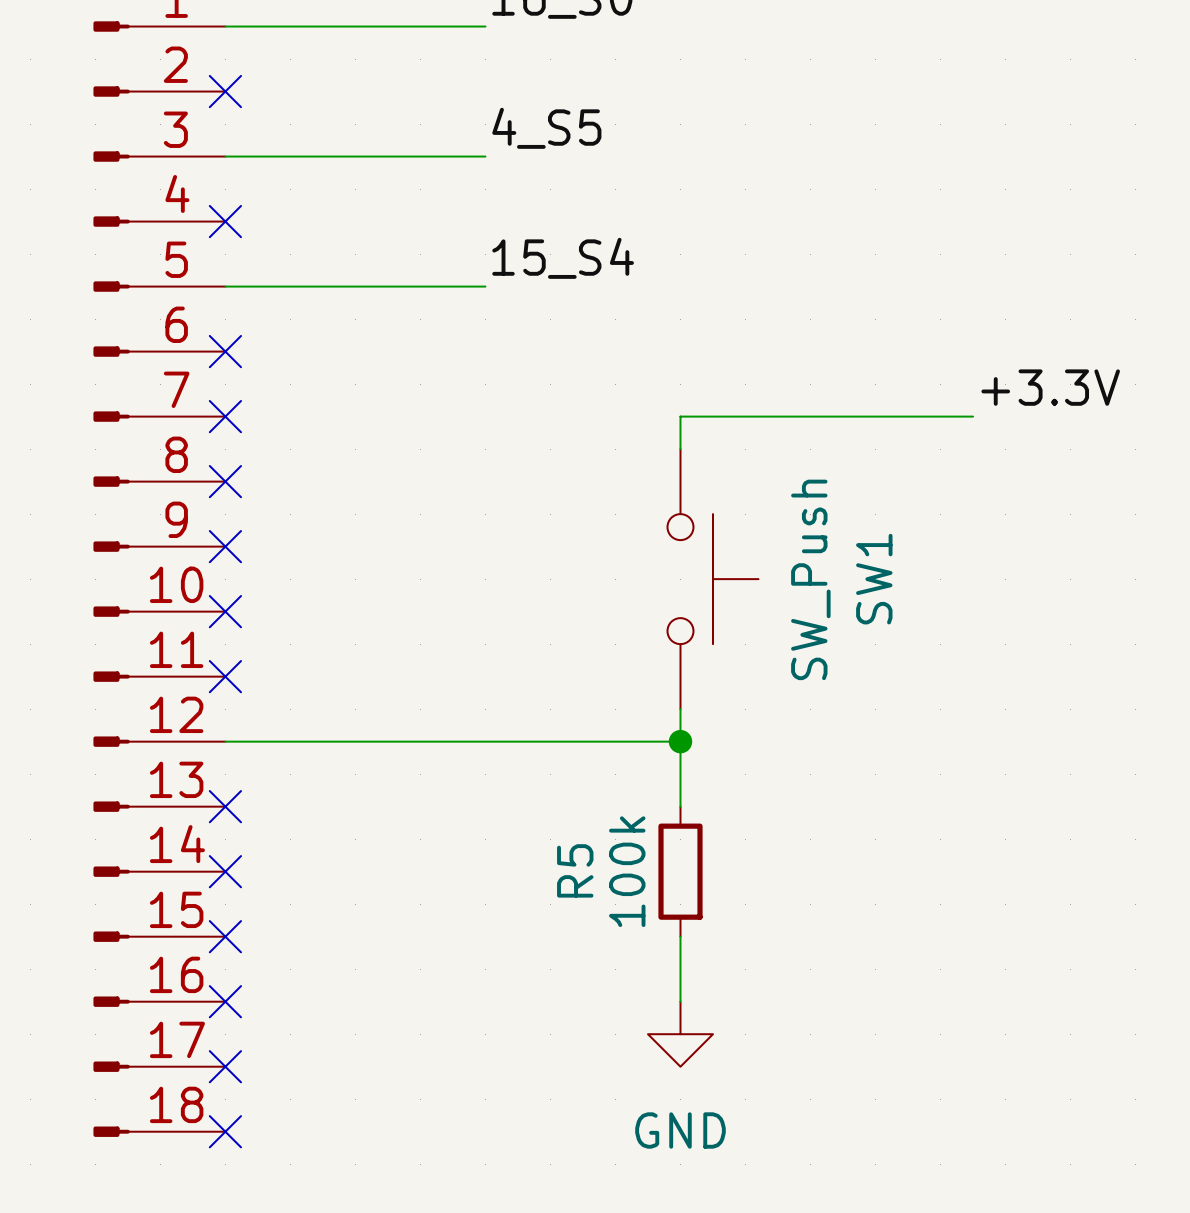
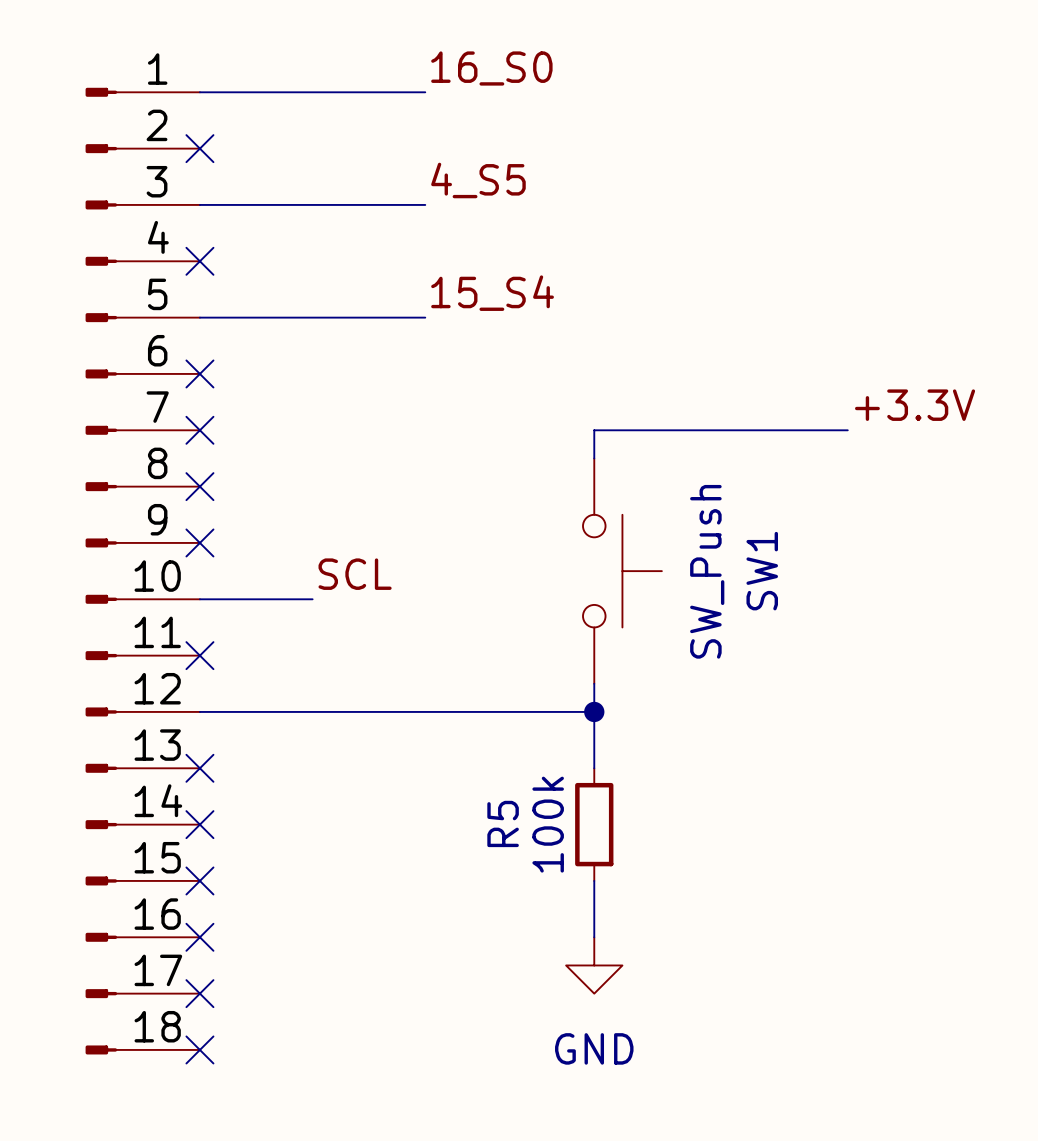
label: none -> SCL (355, 574)
wire: none -> (199, 599) (312, 599)
no-connect mark: (225, 611) -> none

